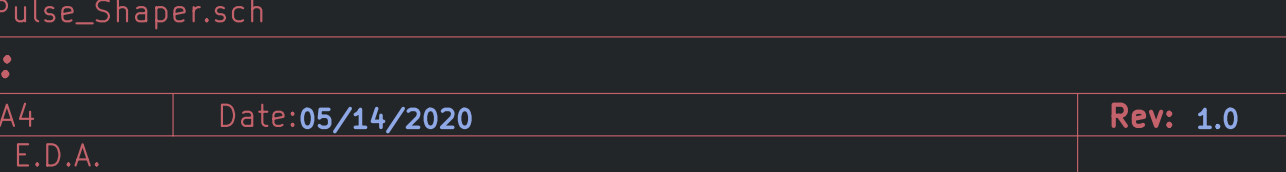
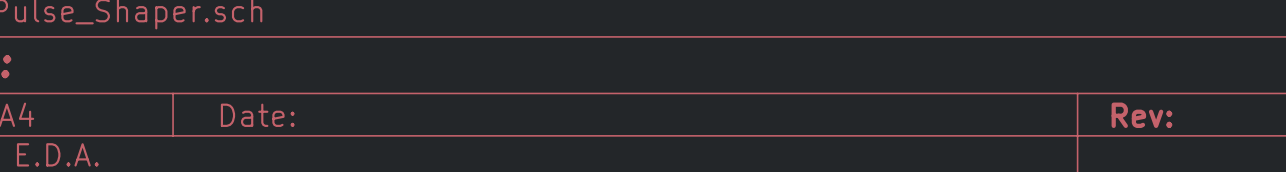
text: 1.0 (1217, 118) -> none
text: 05/14/2020 (386, 120) -> none

